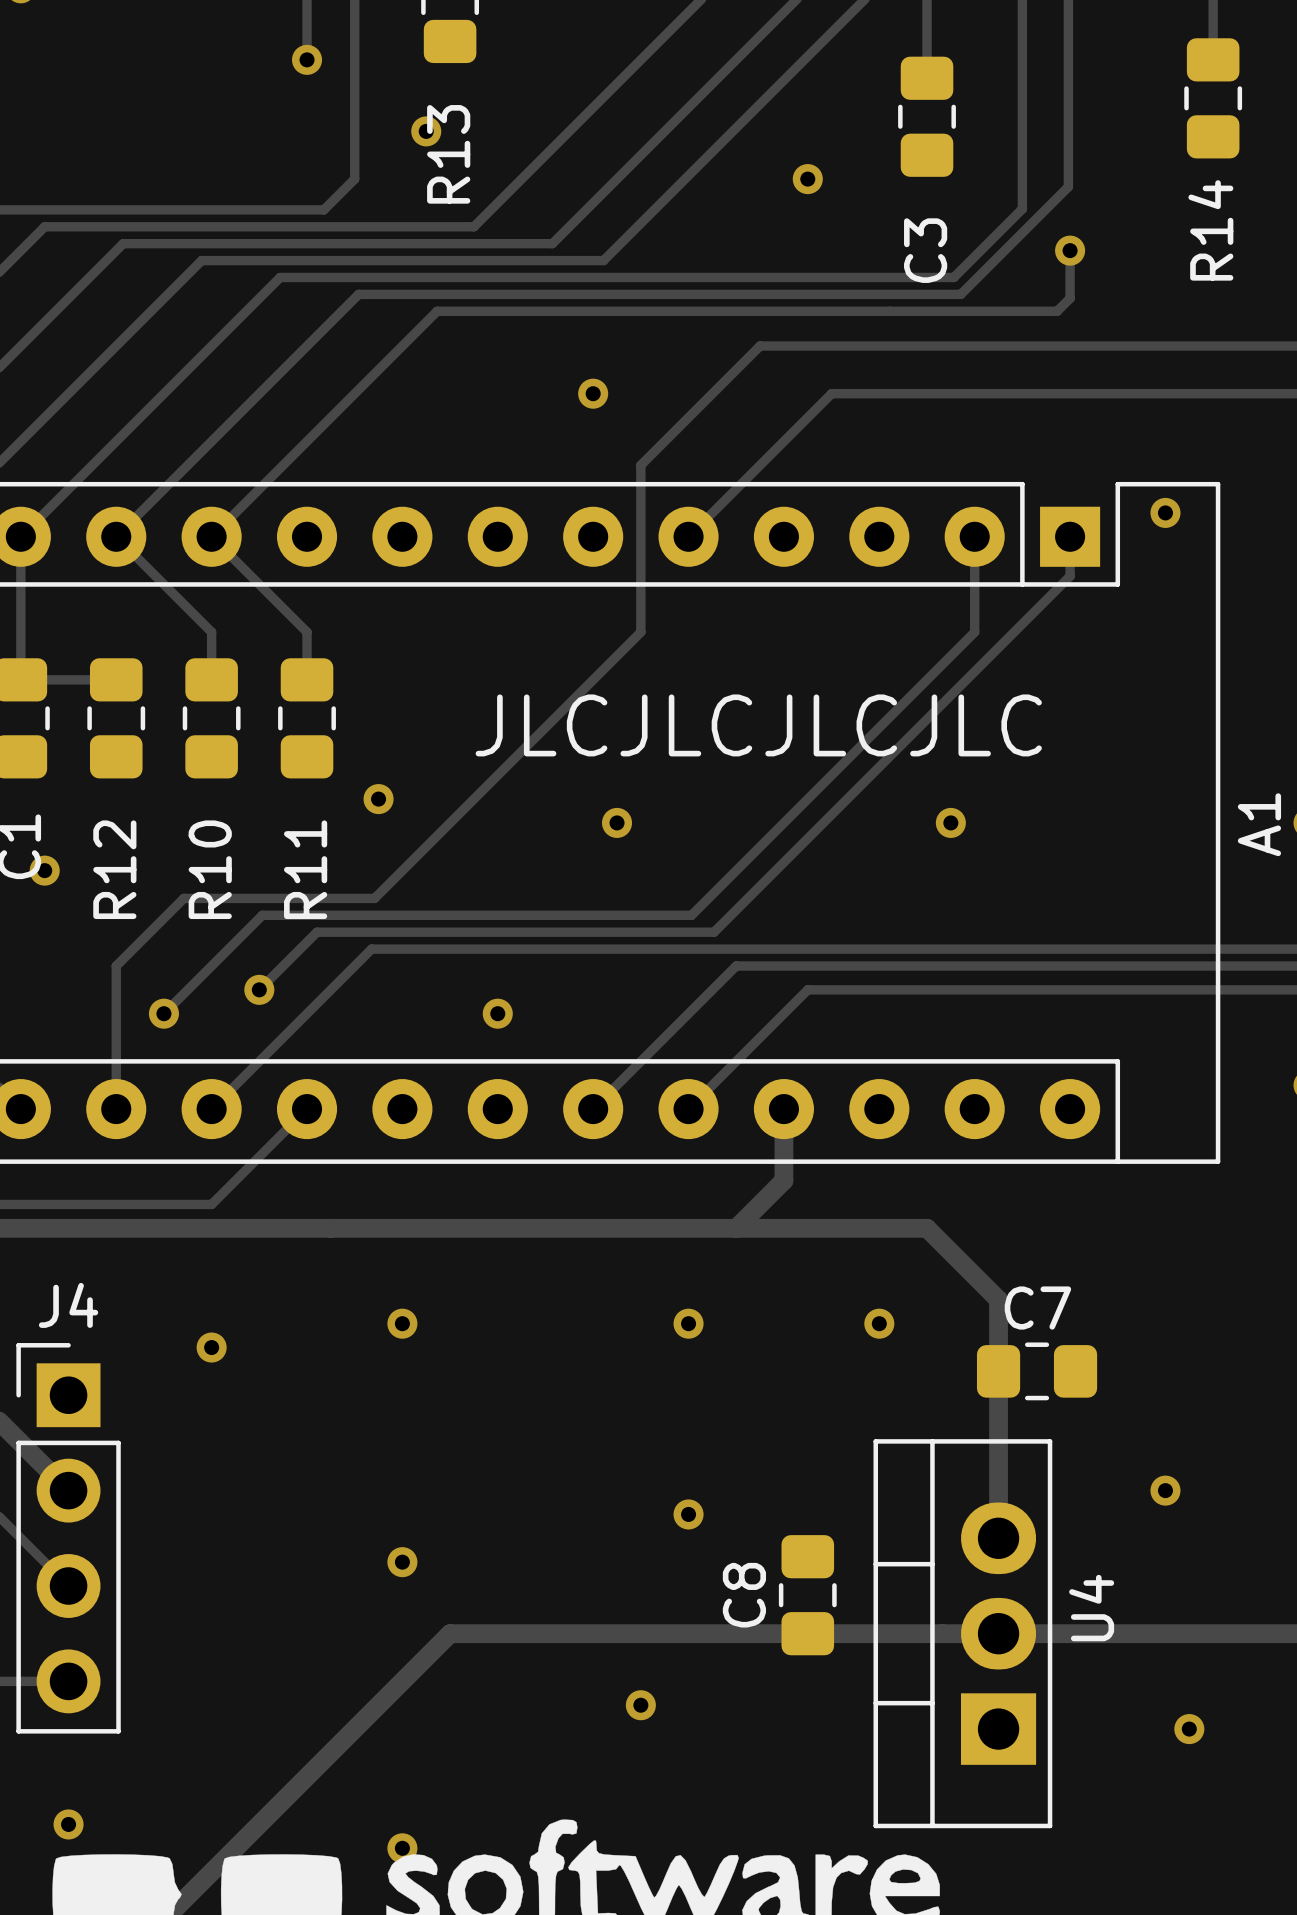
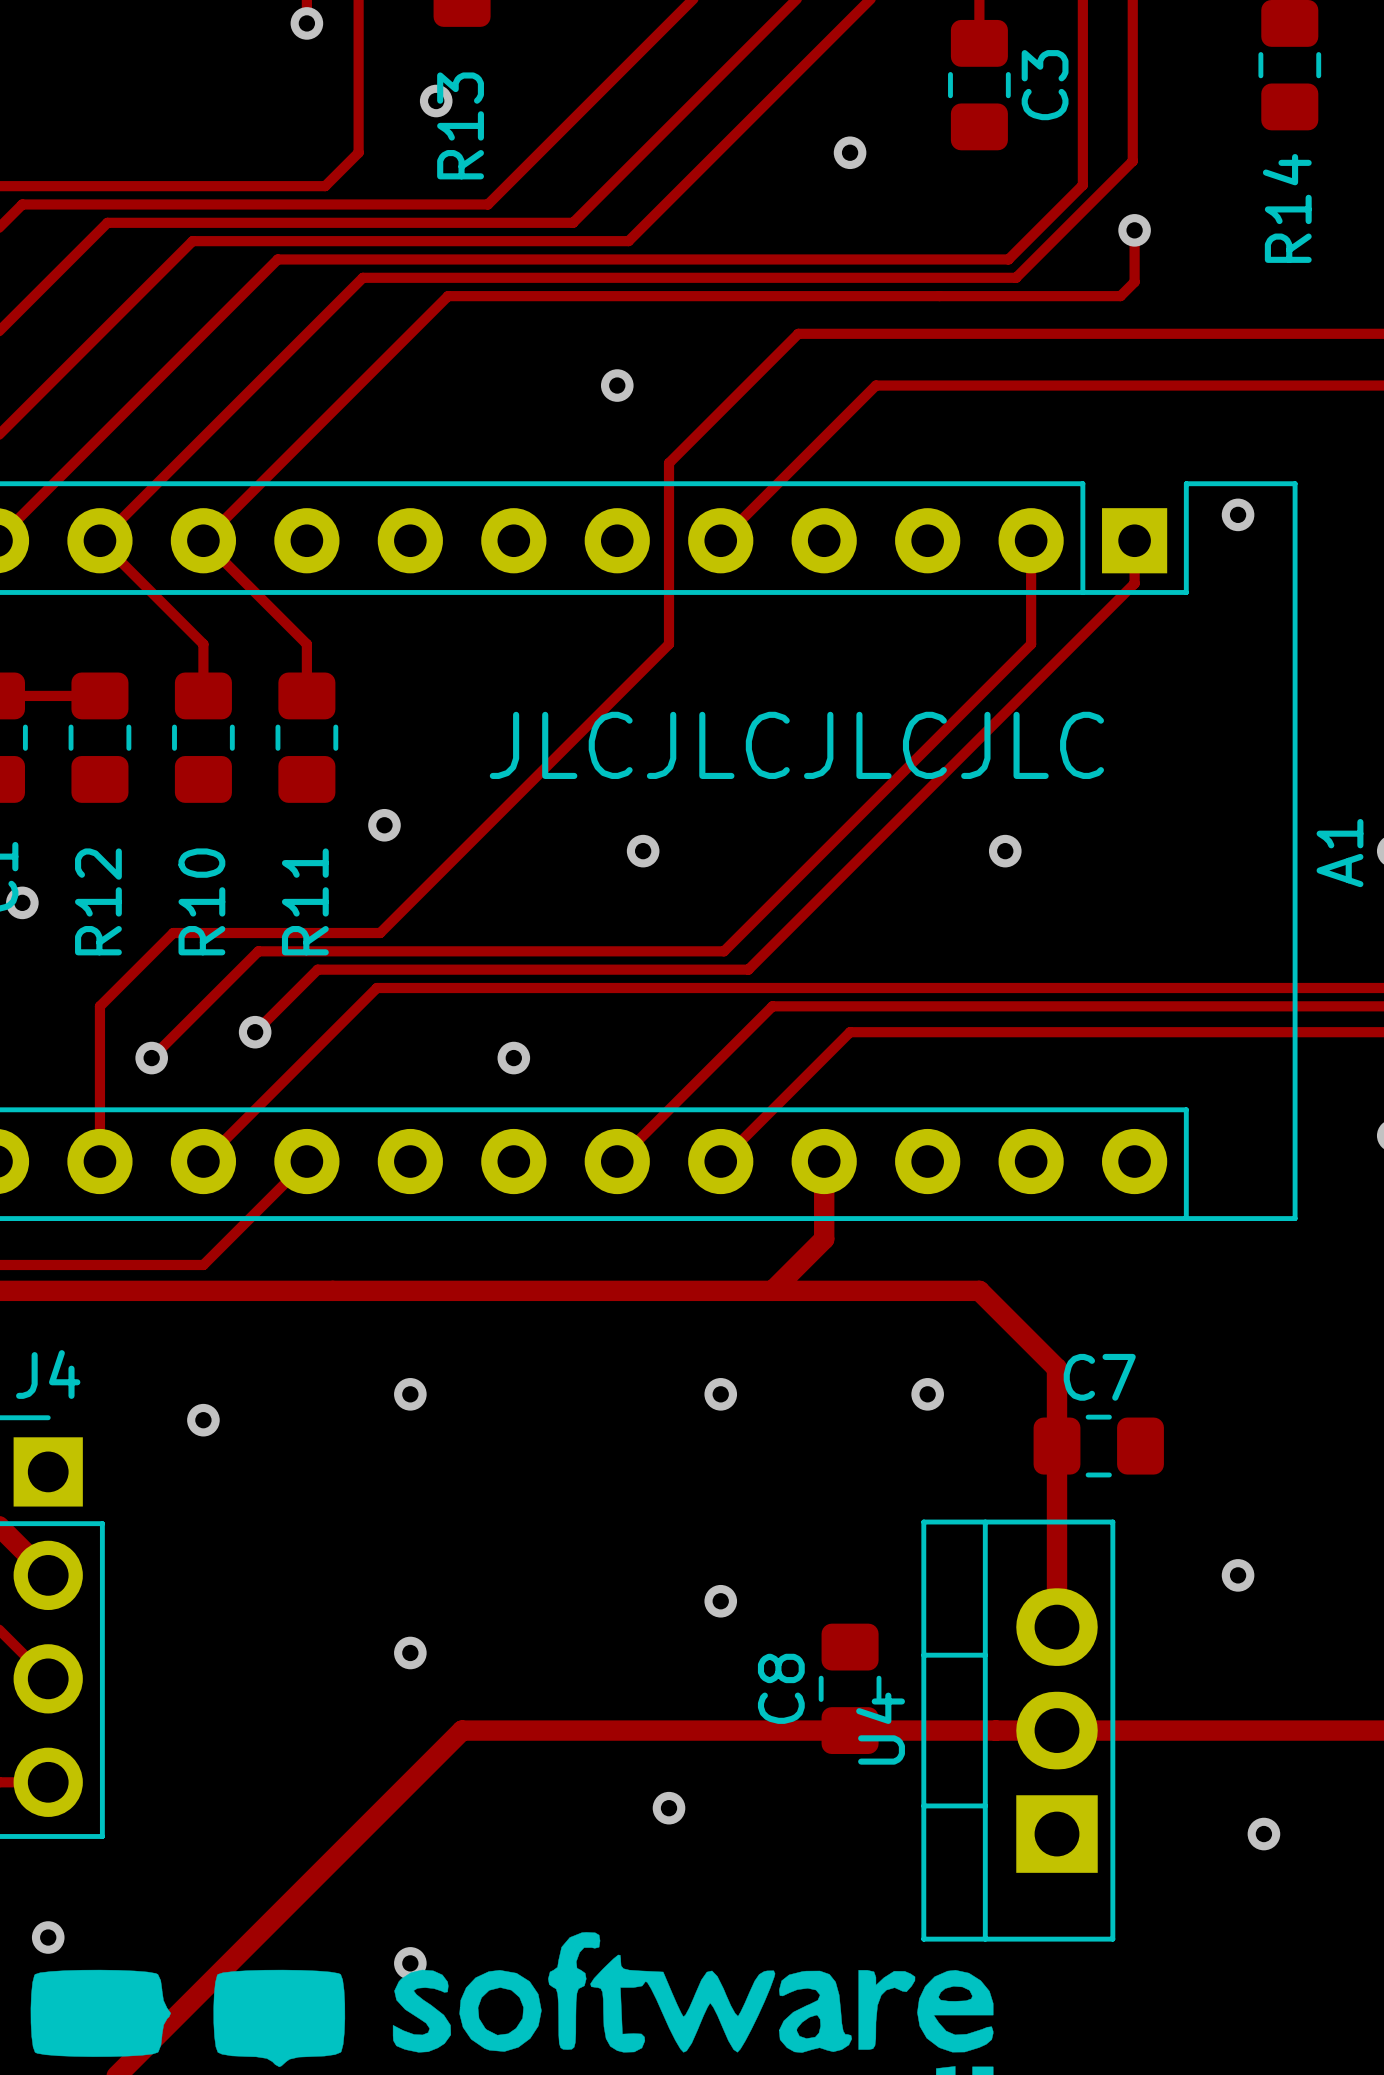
C3 name position: C3 (925, 250) -> C3 (1045, 85)
U4 name position: U4 (1091, 1608) -> U4 (880, 1728)

